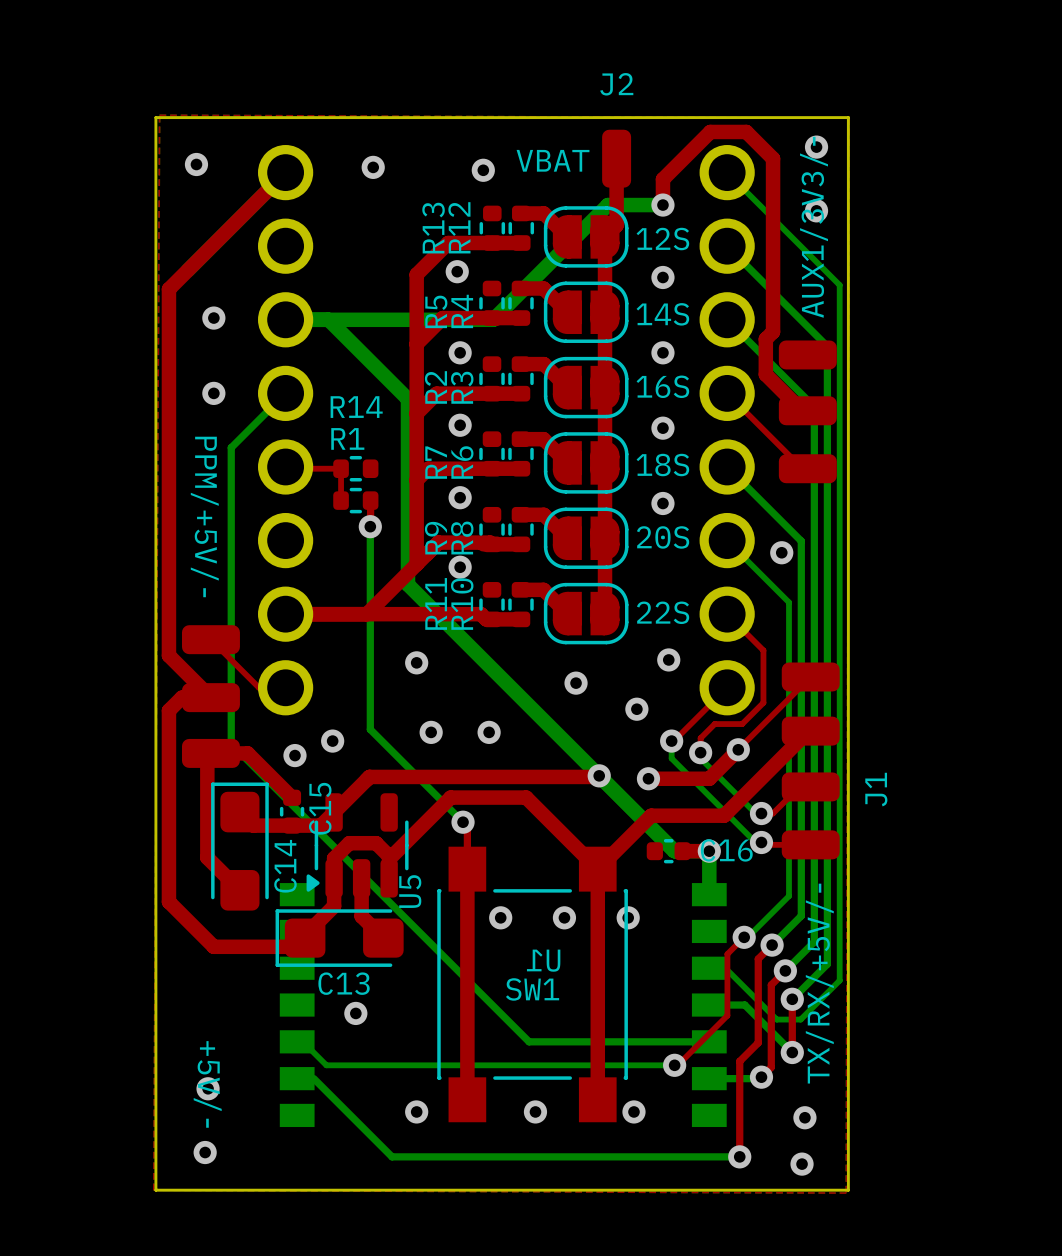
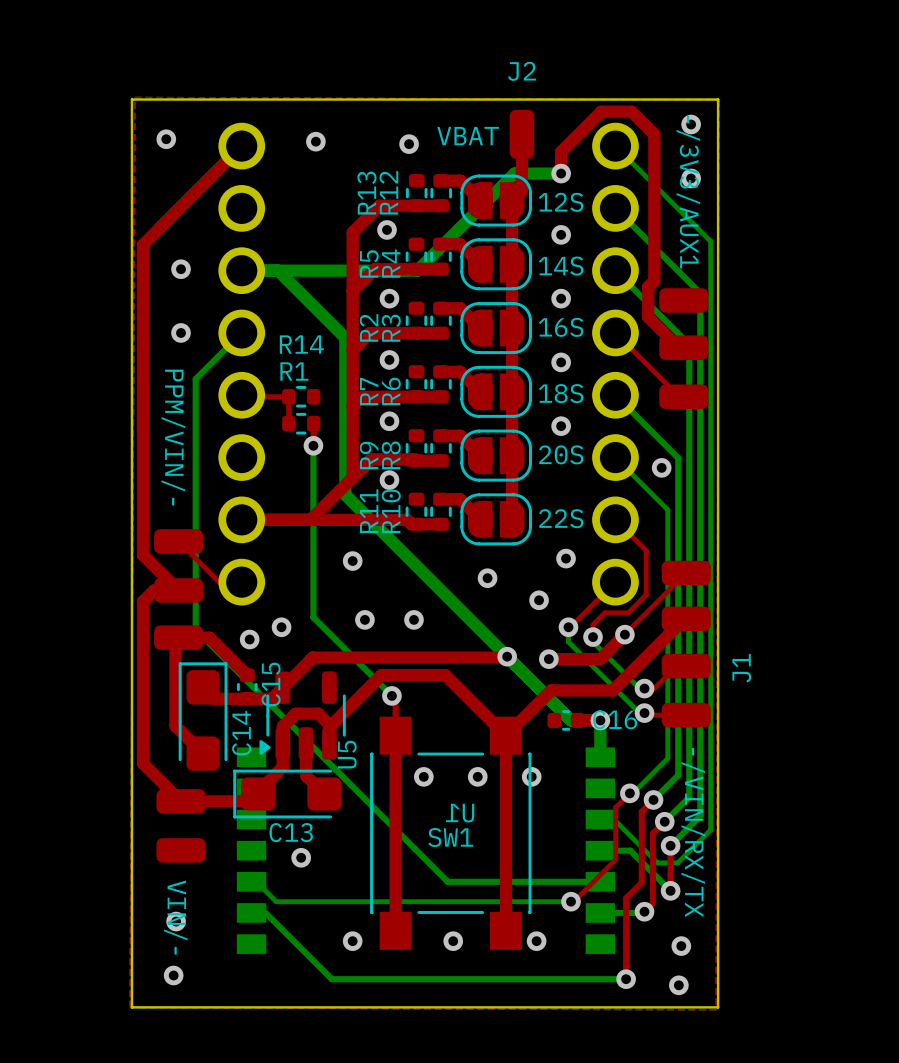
text: AUX1/3V3/- (814, 227) -> -/3V3/AUX1 (688, 192)
text: PPM/+5V/- (204, 516) -> PPM/VIN/- (173, 437)
part: none -> (181, 825)
text: TX/RX/+5V/- (819, 983) -> -/VIN/RX/TX (693, 832)
text: +5V/- (207, 1084) -> VIN/- (175, 917)

